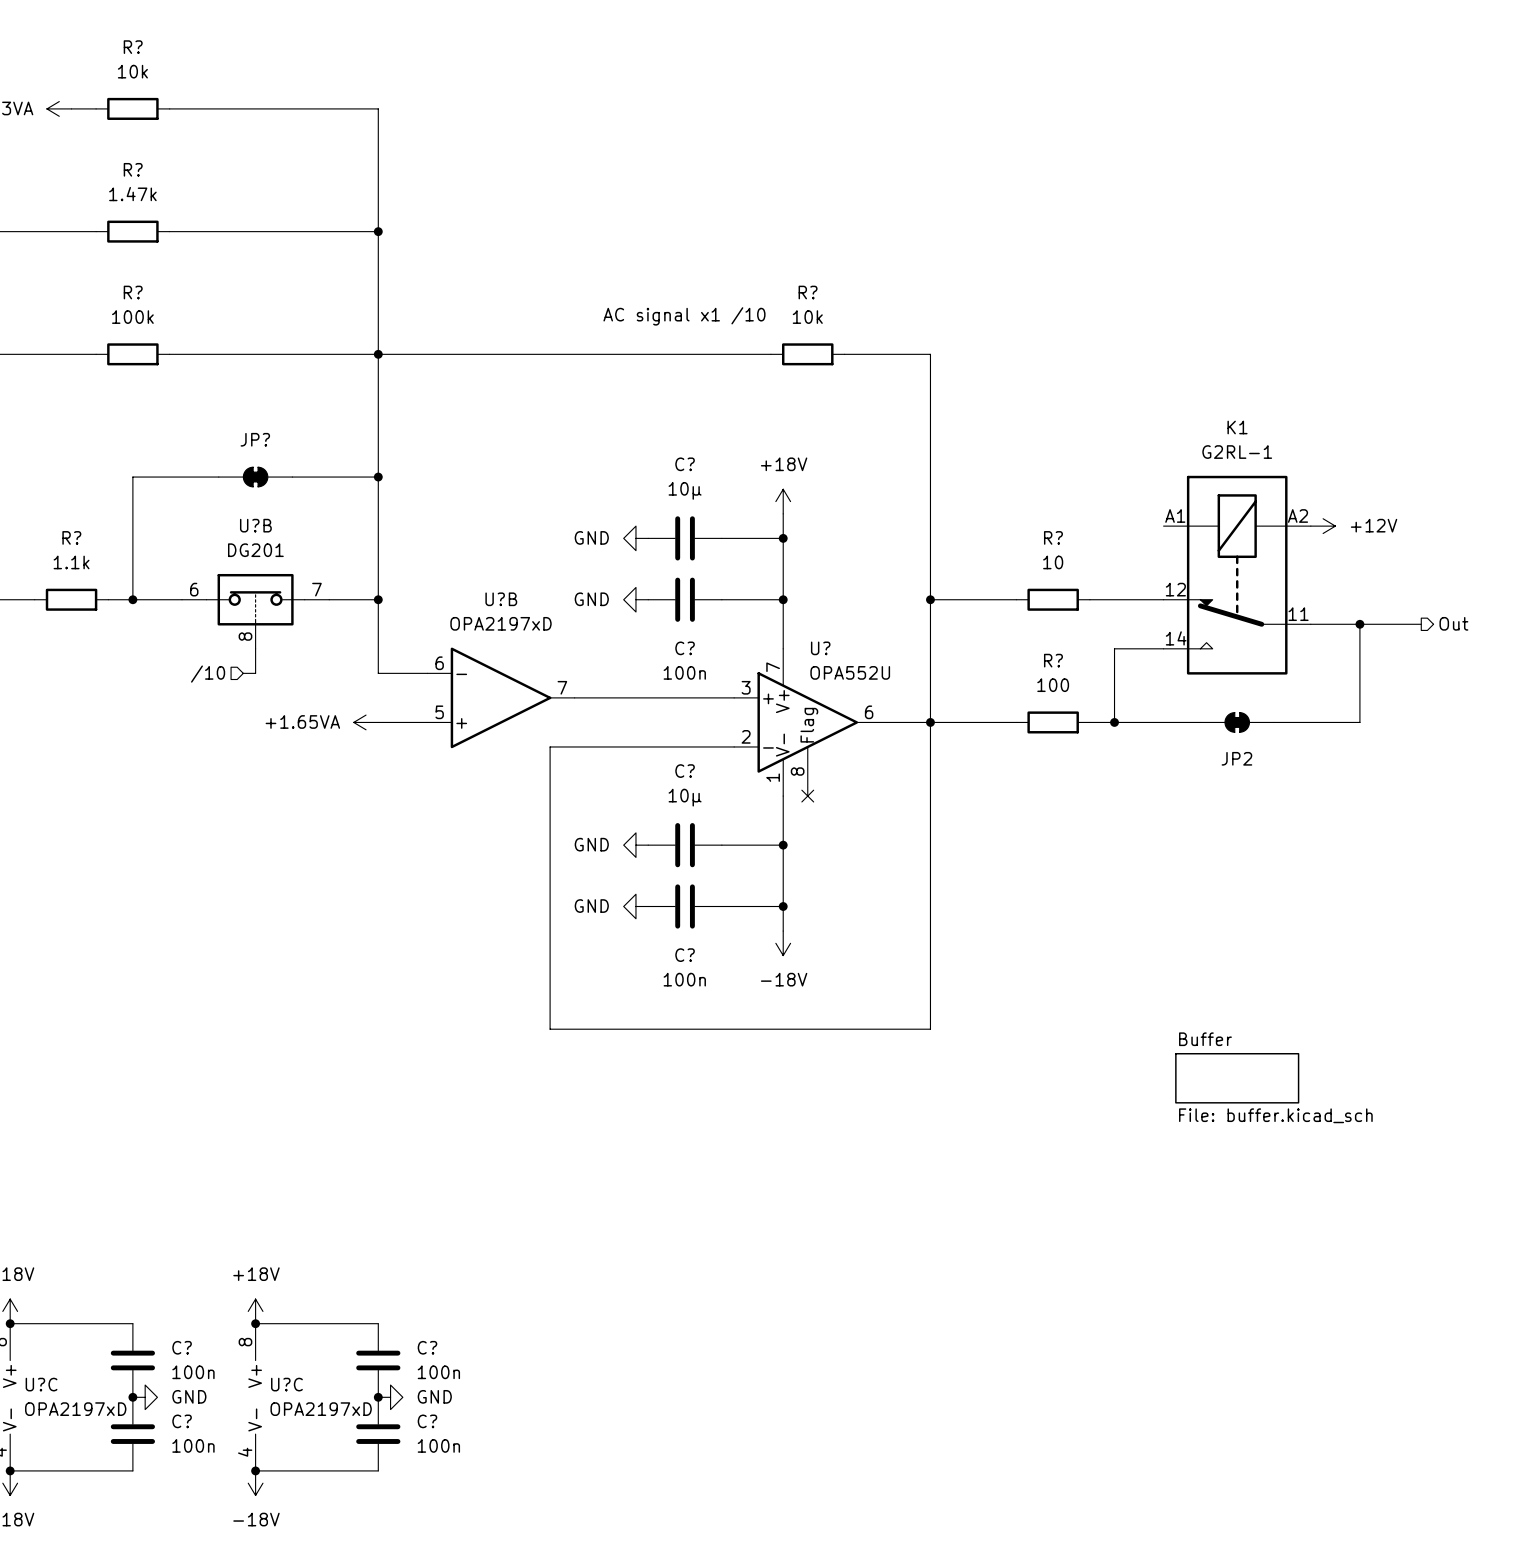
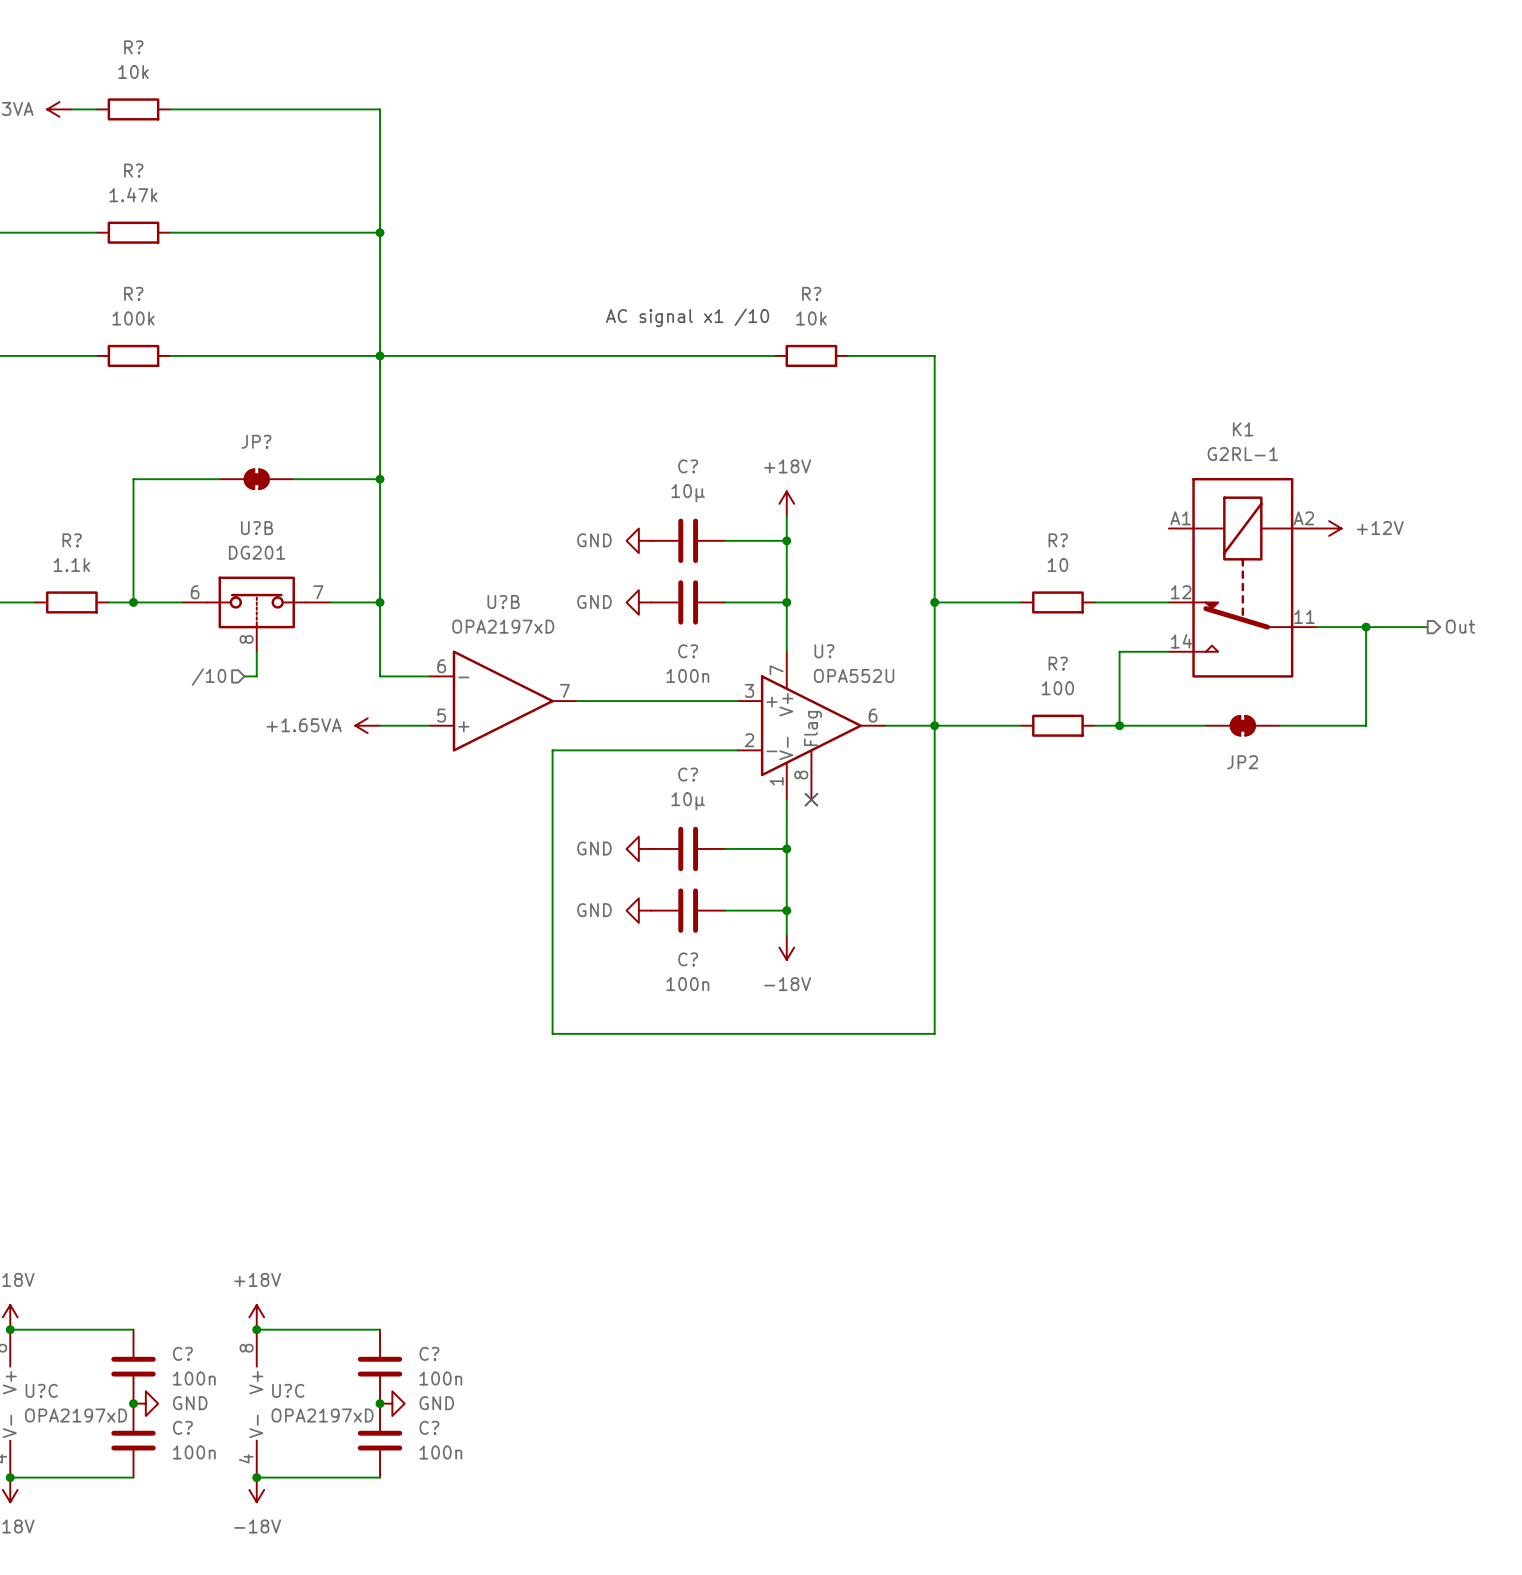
sheet Buffer: File: buffer.kicad_sch (1237, 1078) -> none

